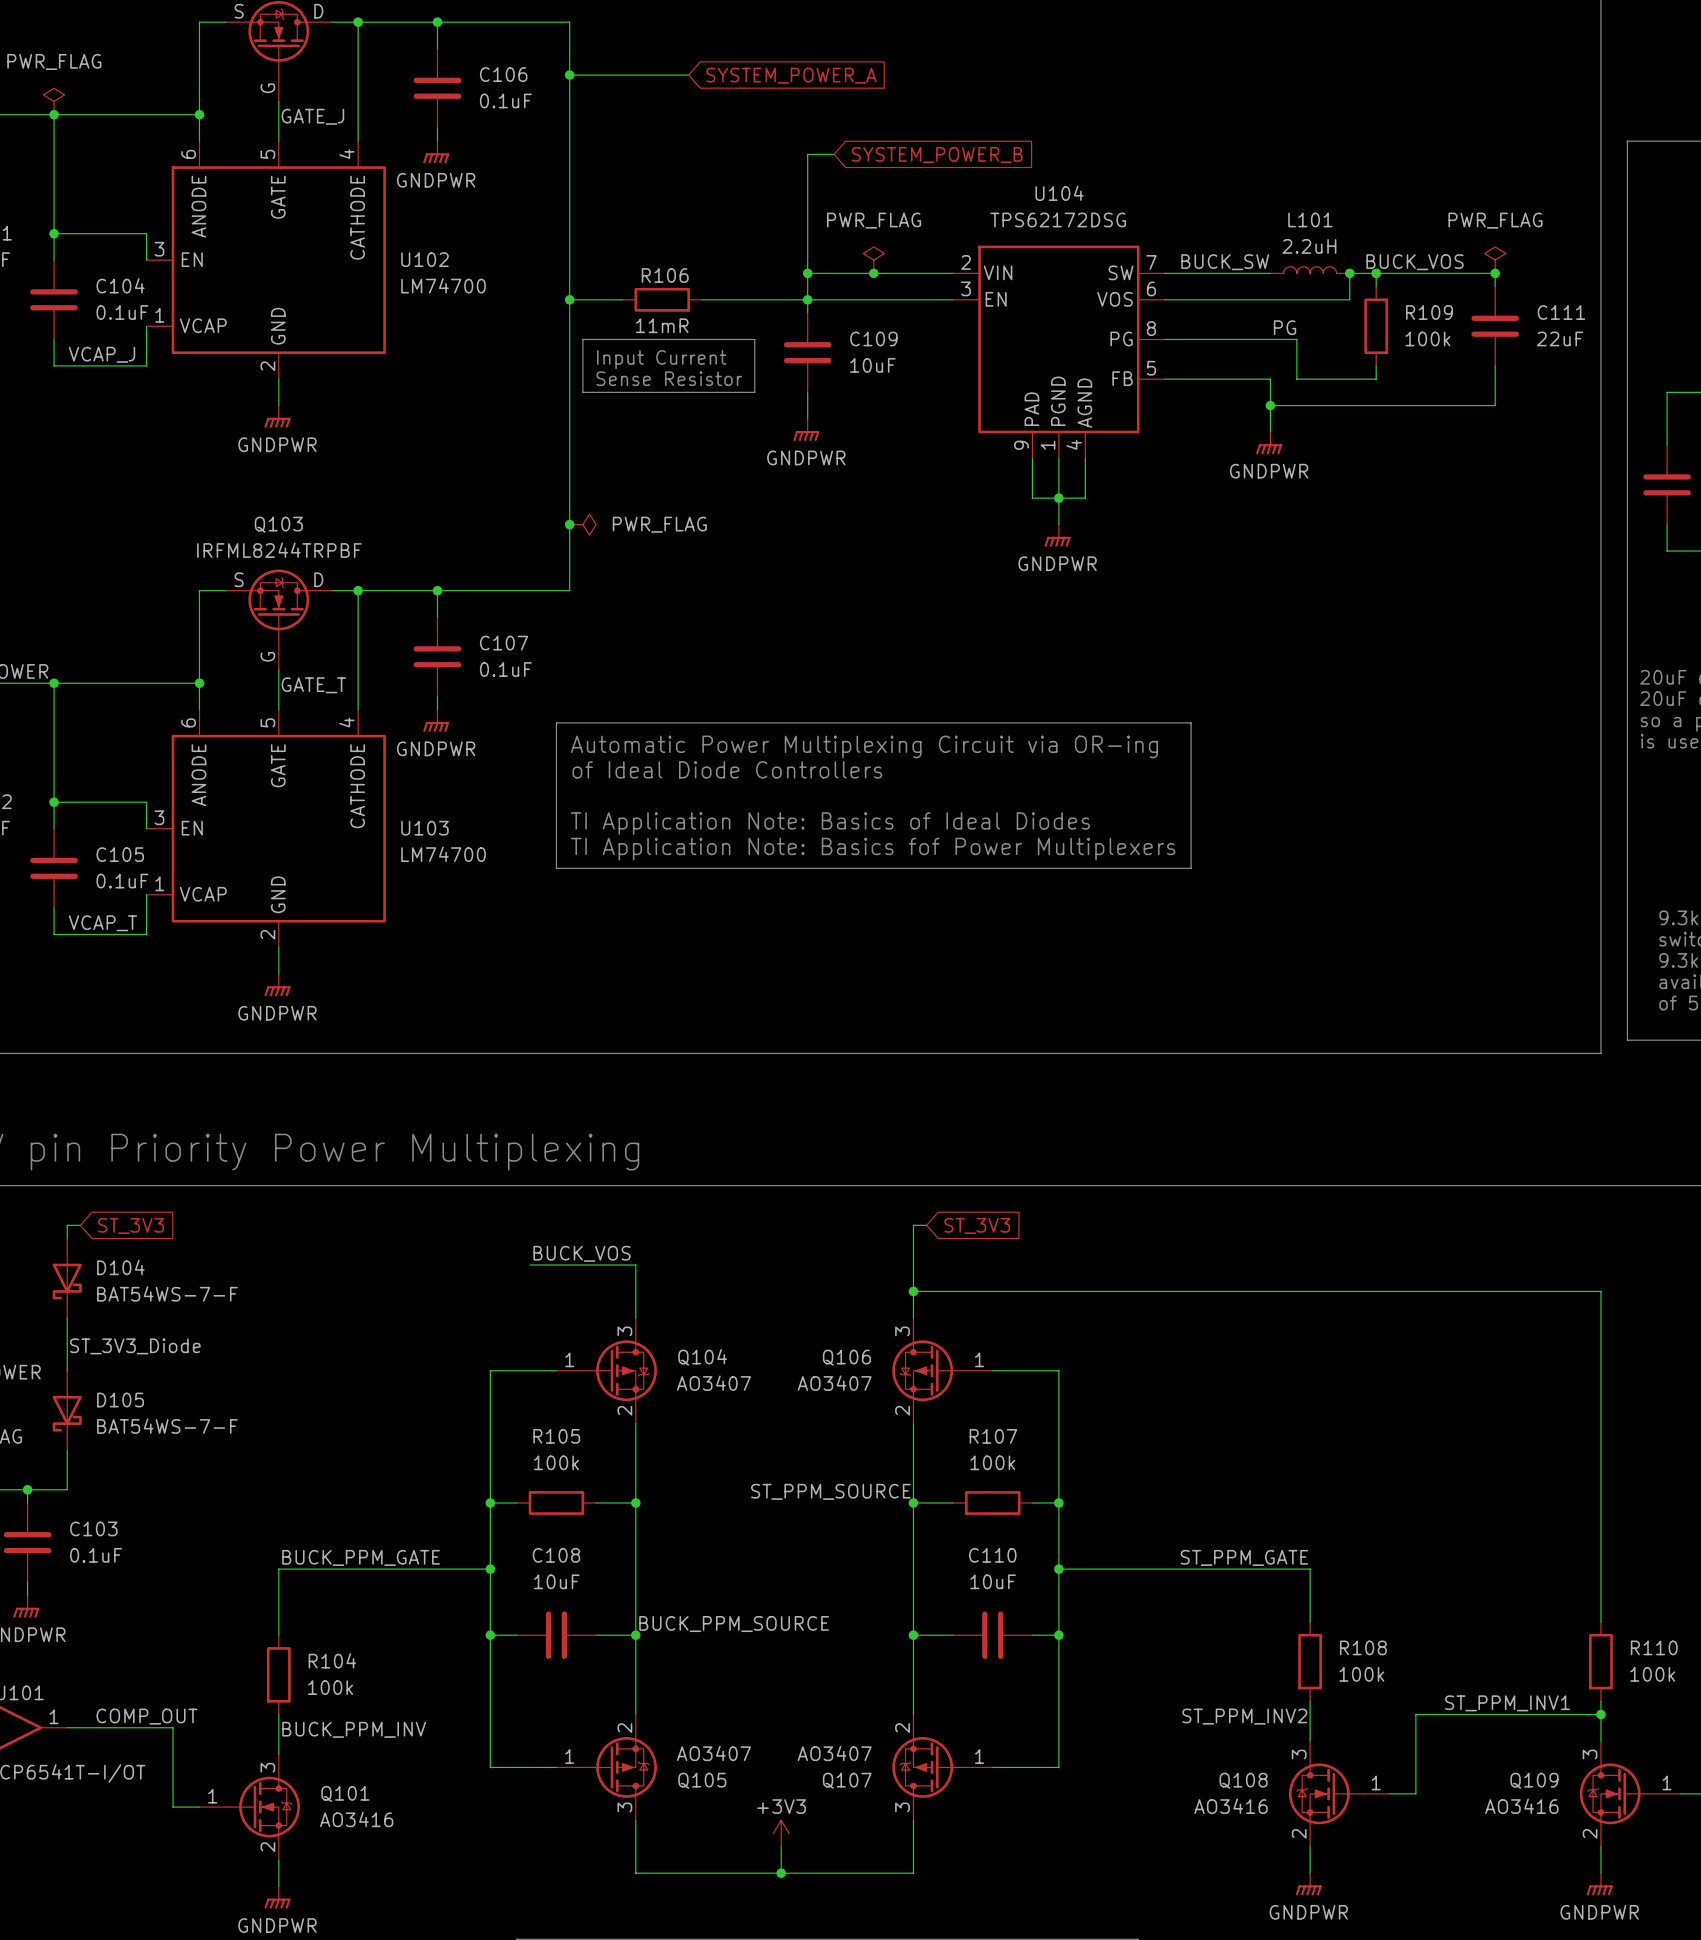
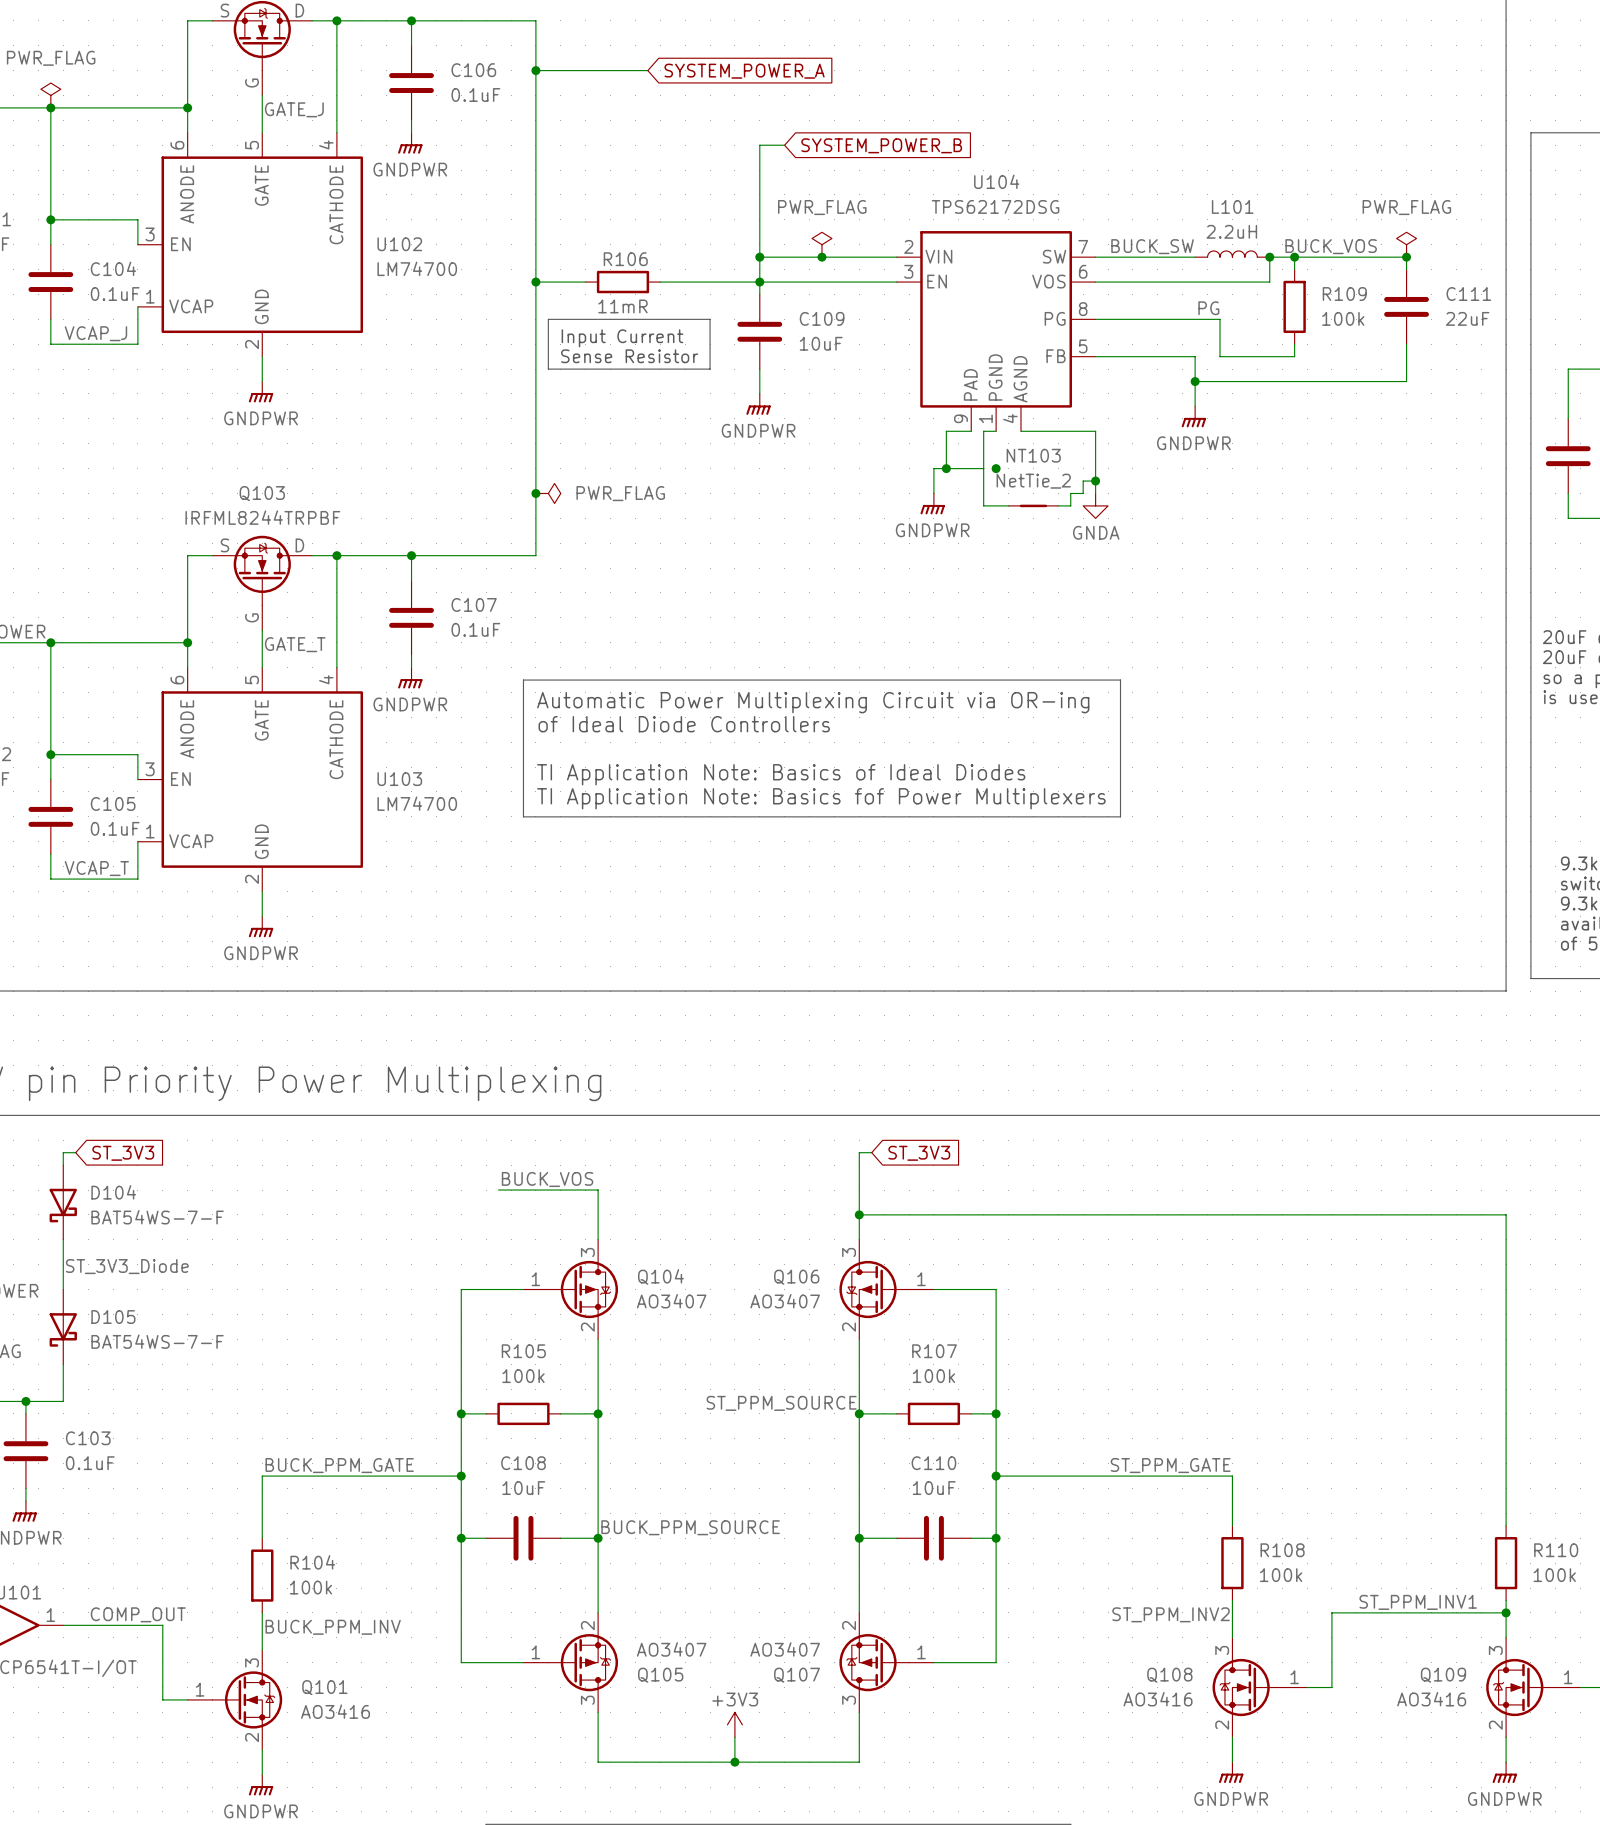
wire: (1032, 458) (1032, 498) -> (971, 431) (946, 431) (946, 468)
wire: (1058, 458) (1058, 524) -> (996, 431) (983, 431) (983, 505) (1008, 505)
wire: (1085, 458) (1085, 498) (1045, 498) -> (1020, 431) (1095, 431) (1095, 493)
junction: none -> (946, 468)
wire: none -> (971, 468) (933, 468) (933, 493)
wire: none -> (1095, 481) (1083, 481) (1083, 493) (1070, 493) (1070, 505) (1058, 505)
junction: none -> (1095, 481)
power symbol position: GNDPWR (1057, 535) -> GNDPWR (932, 503)
NT103: none -> NetTie_2 (1033, 505)
power symbol: none -> GNDA (1095, 505)

